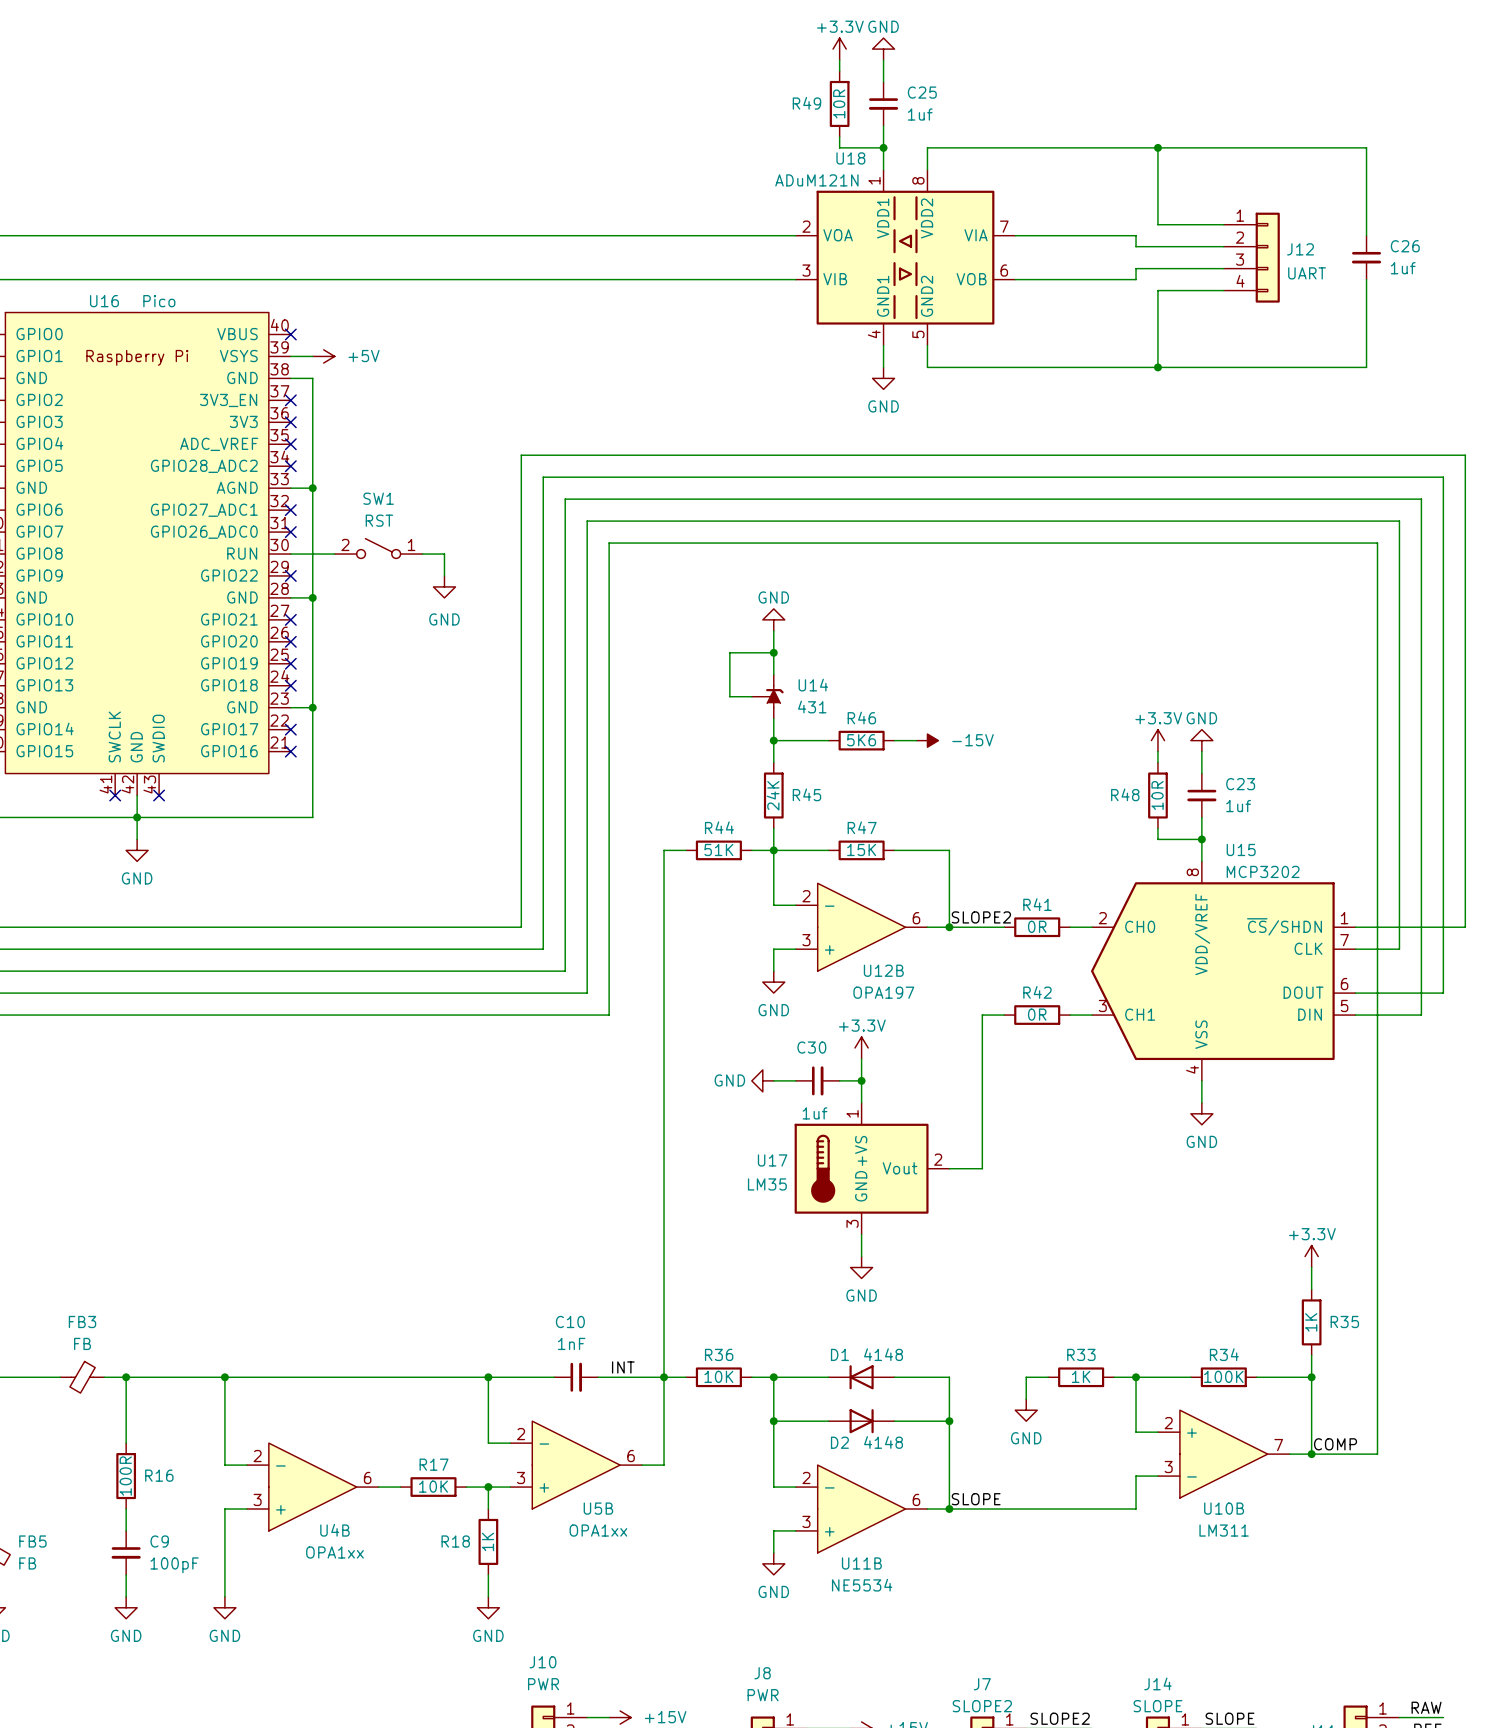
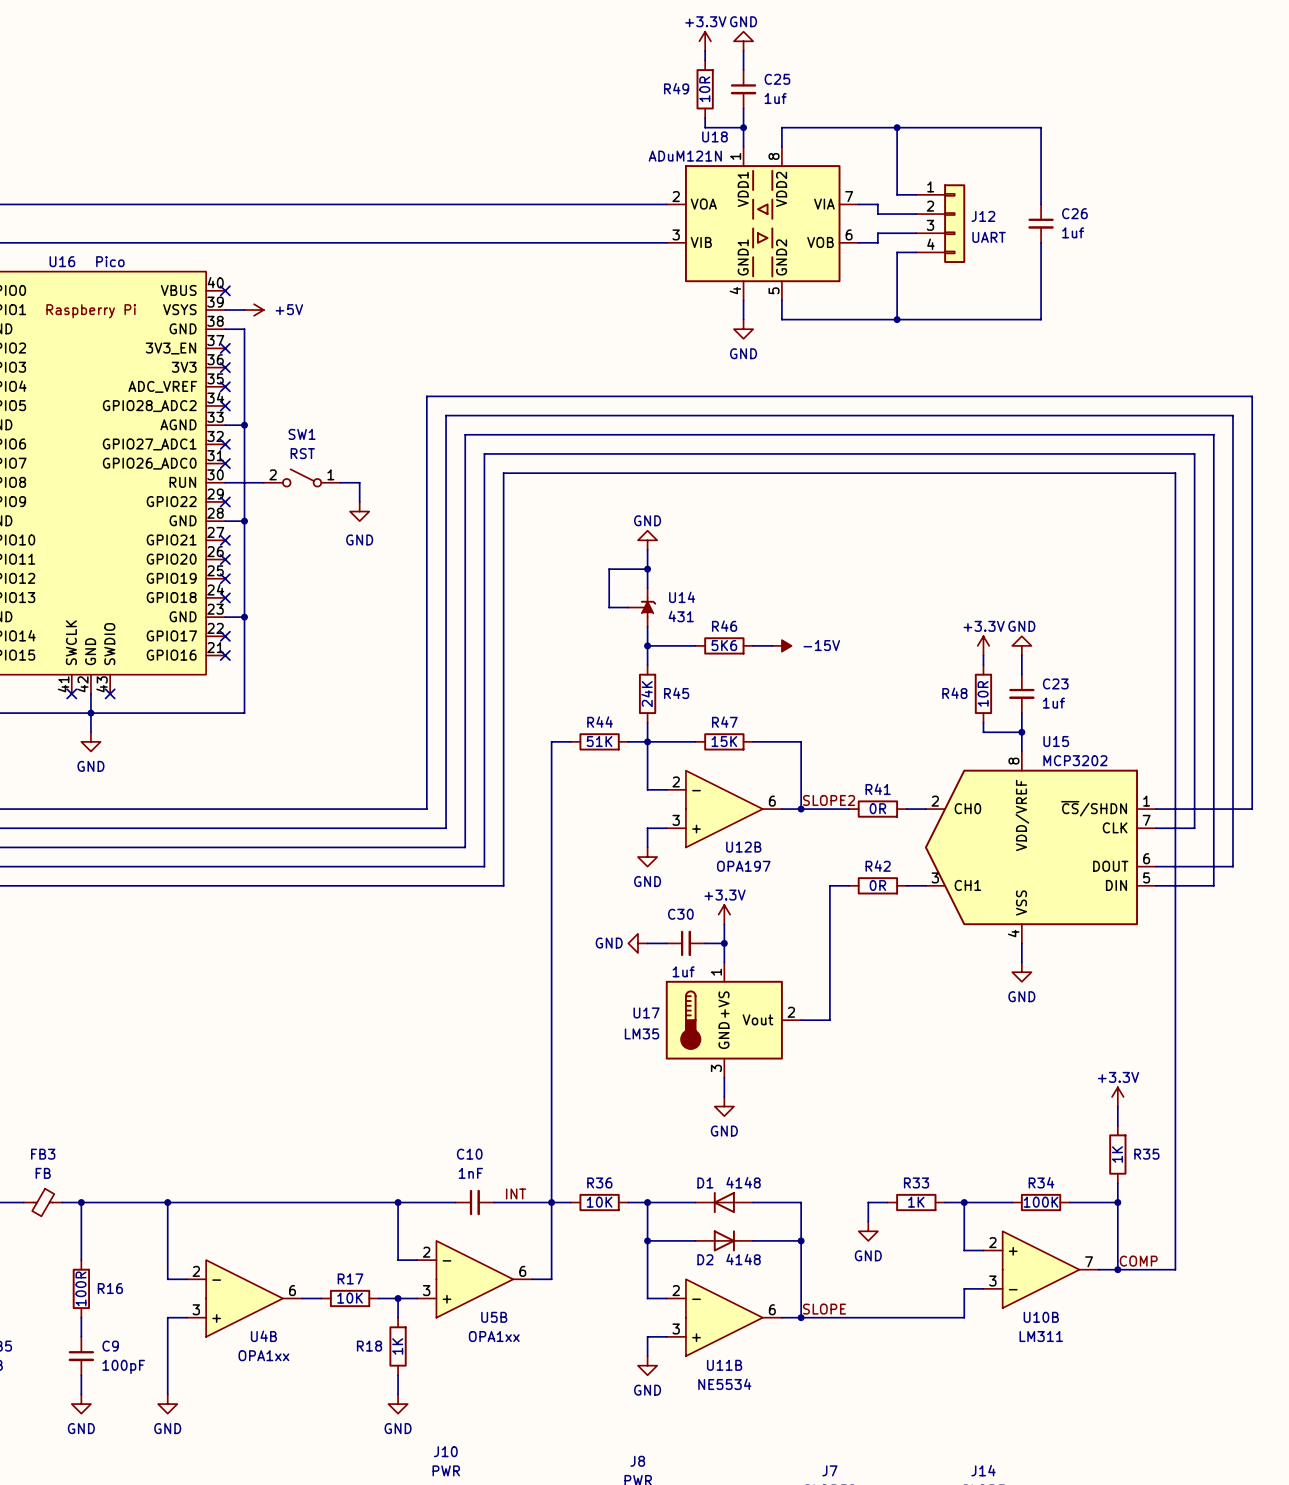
wire: none -> (897, 127) (897, 194) (916, 194)
junction: none -> (897, 127)
wire: (1157, 147) (1157, 224) (1223, 224) -> none
junction: (1157, 147) -> none
wire: (1223, 147) (1366, 147) (1366, 235) -> (1041, 127) (1041, 204)
wire: (1037, 235) (1136, 235) (1136, 246) (1223, 246) -> (877, 204) (877, 214) (916, 214)
J12 position: (1251, 257) -> (940, 223)
C26 position: (1366, 257) -> (1041, 223)
wire: (1223, 268) (1136, 268) (1136, 279) (1037, 279) -> (916, 233) (877, 233) (877, 242)
wire: (1366, 279) (1366, 367) (1223, 367) -> (1041, 242) (1041, 319)
wire: none -> (916, 252) (897, 252) (897, 319)
wire: (1223, 290) (1157, 290) (1157, 367) -> none
junction: none -> (897, 319)
junction: (1157, 367) -> none

